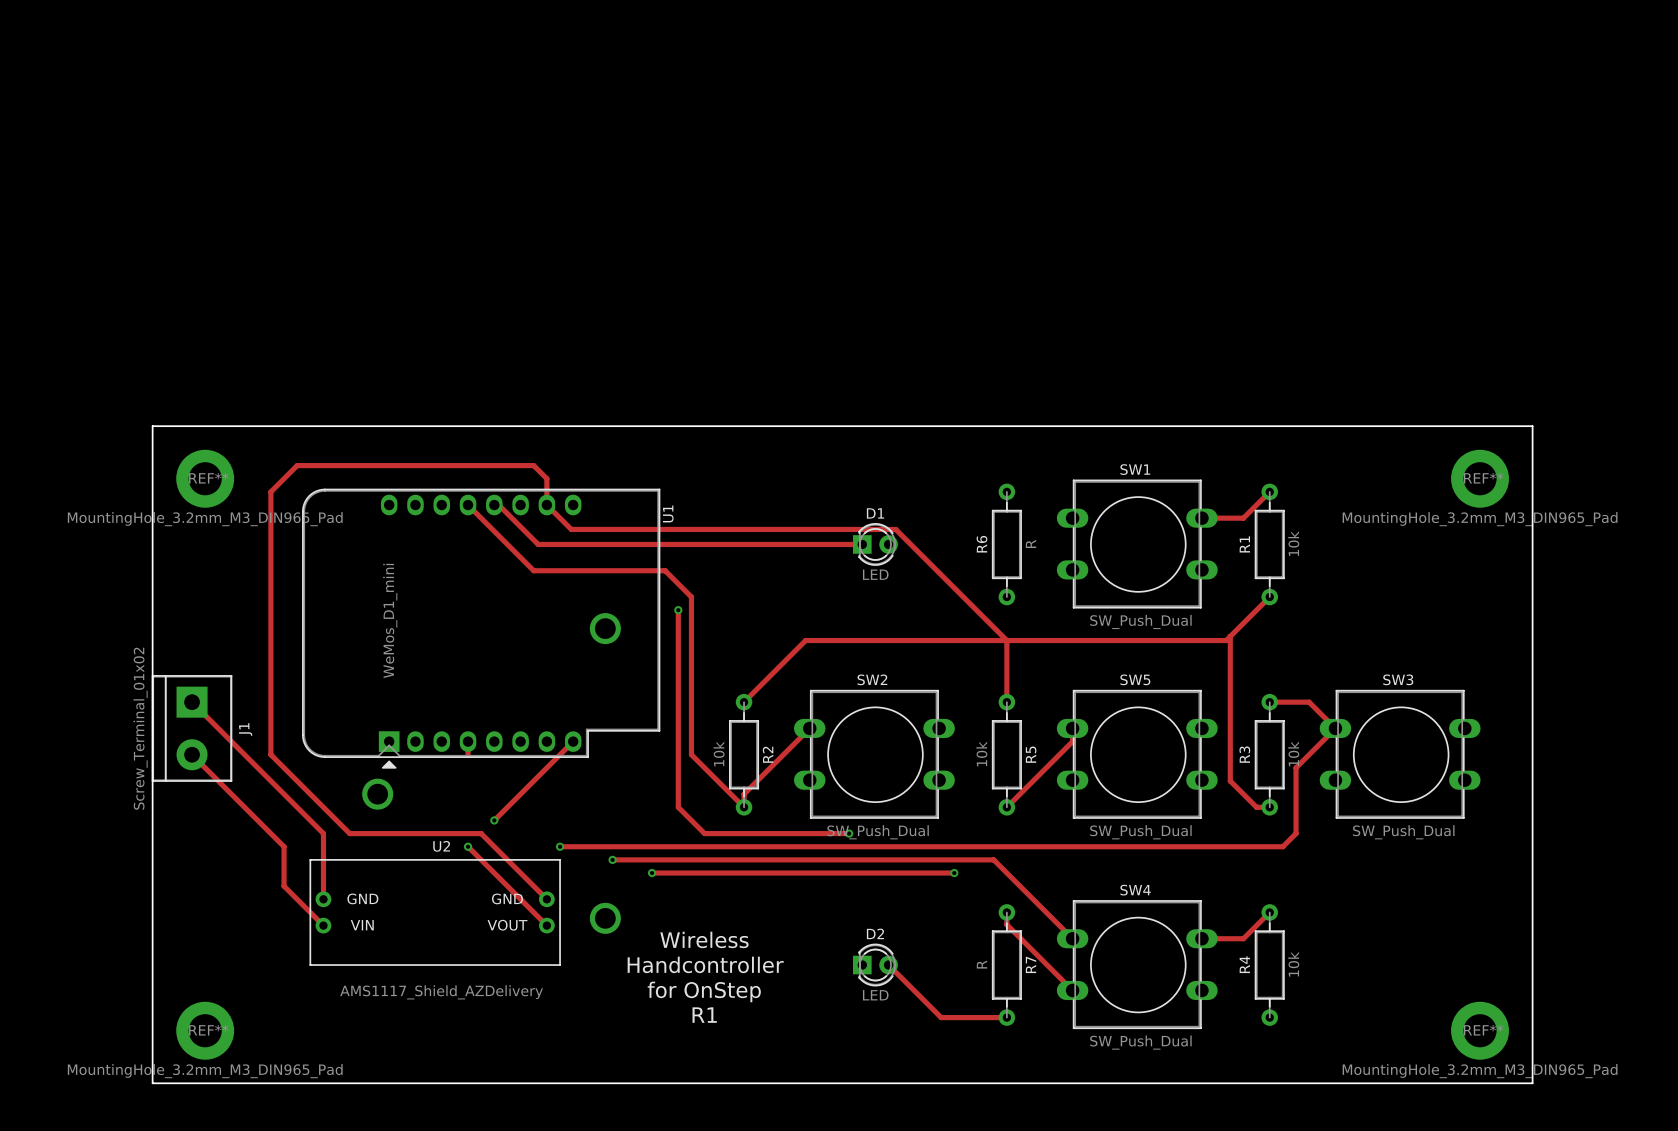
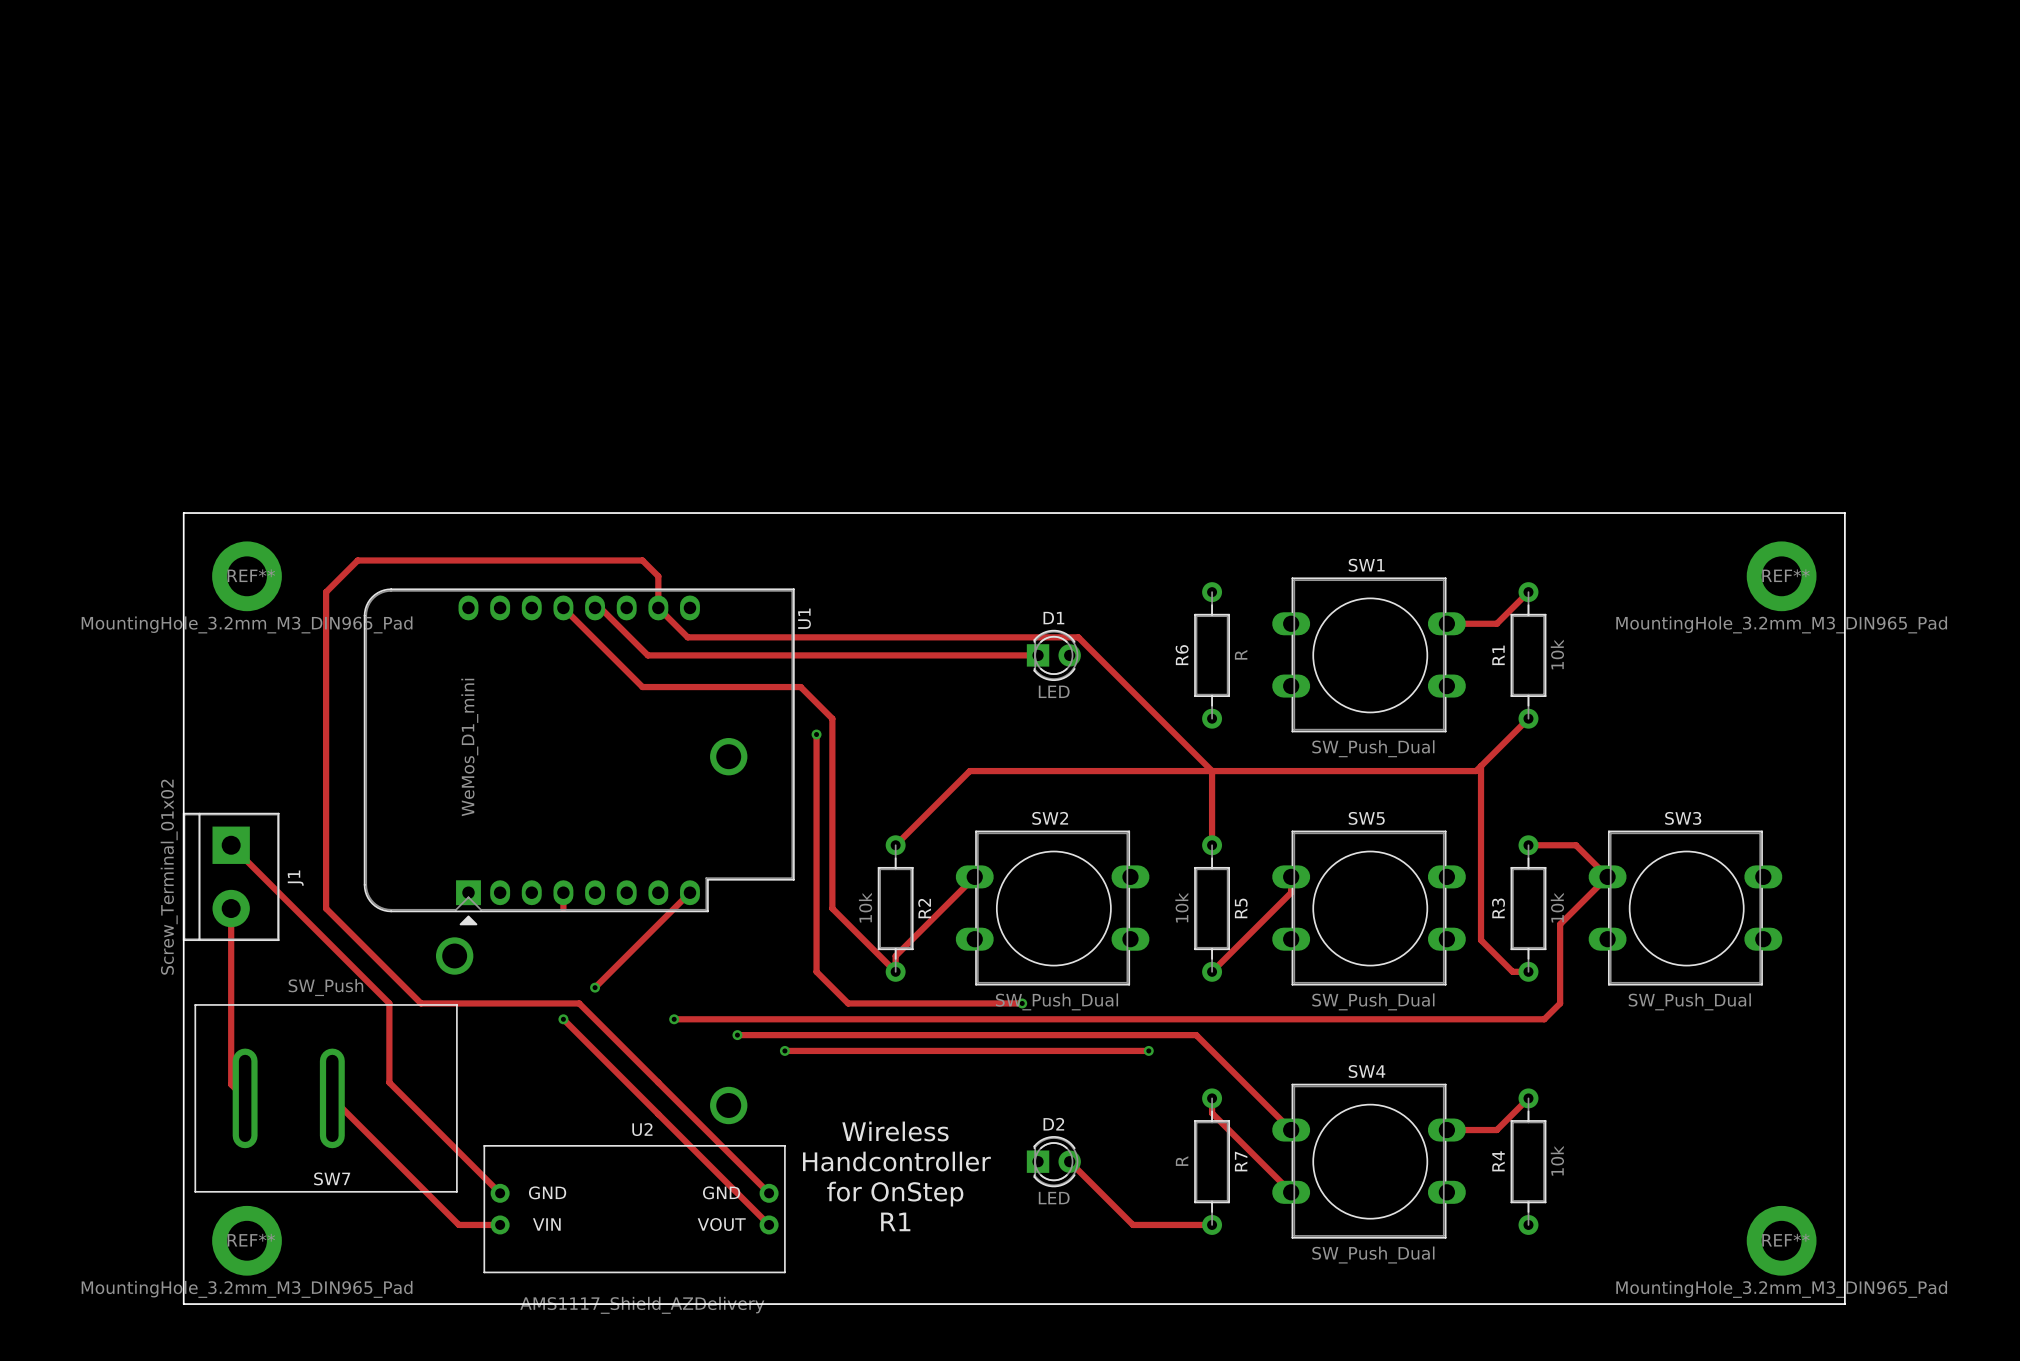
track: (192, 754) (284, 846) (284, 886) (323, 925) -> (231, 908) (231, 1084) (245, 1098)
track: none -> (389, 1082) (500, 1193)
track: none -> (658, 1082) (769, 1193)
SW7: none -> SW_Push (326, 1098)
track: none -> (332, 1098) (458, 1224) (500, 1224)
U2 position: (435, 912) -> (634, 1209)
track: none -> (658, 1114) (769, 1224)
text position: Wireless (704, 939) -> Wireless (895, 1131)
text position: Handcontroller (705, 964) -> Handcontroller (896, 1161)
text position: for OnStep (704, 991) -> for OnStep (895, 1194)
text position: R1 (704, 1015) -> R1 (895, 1221)

